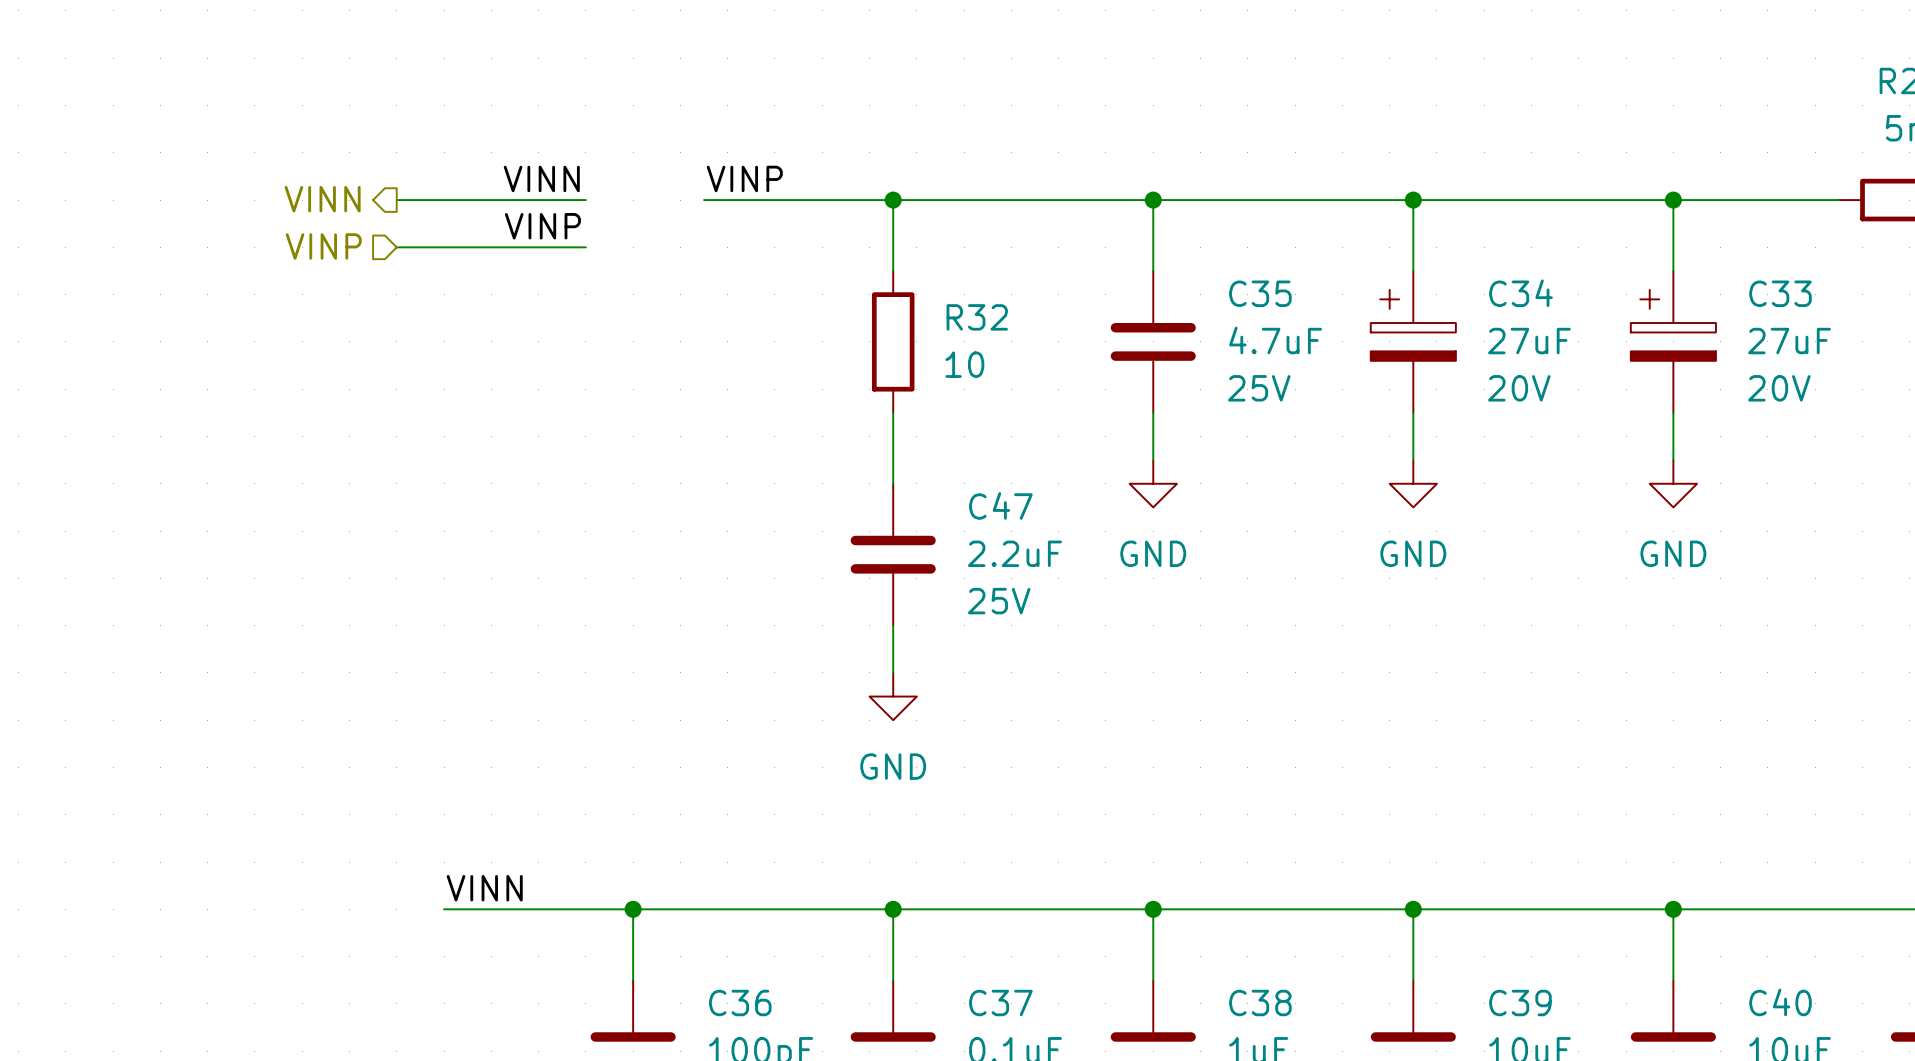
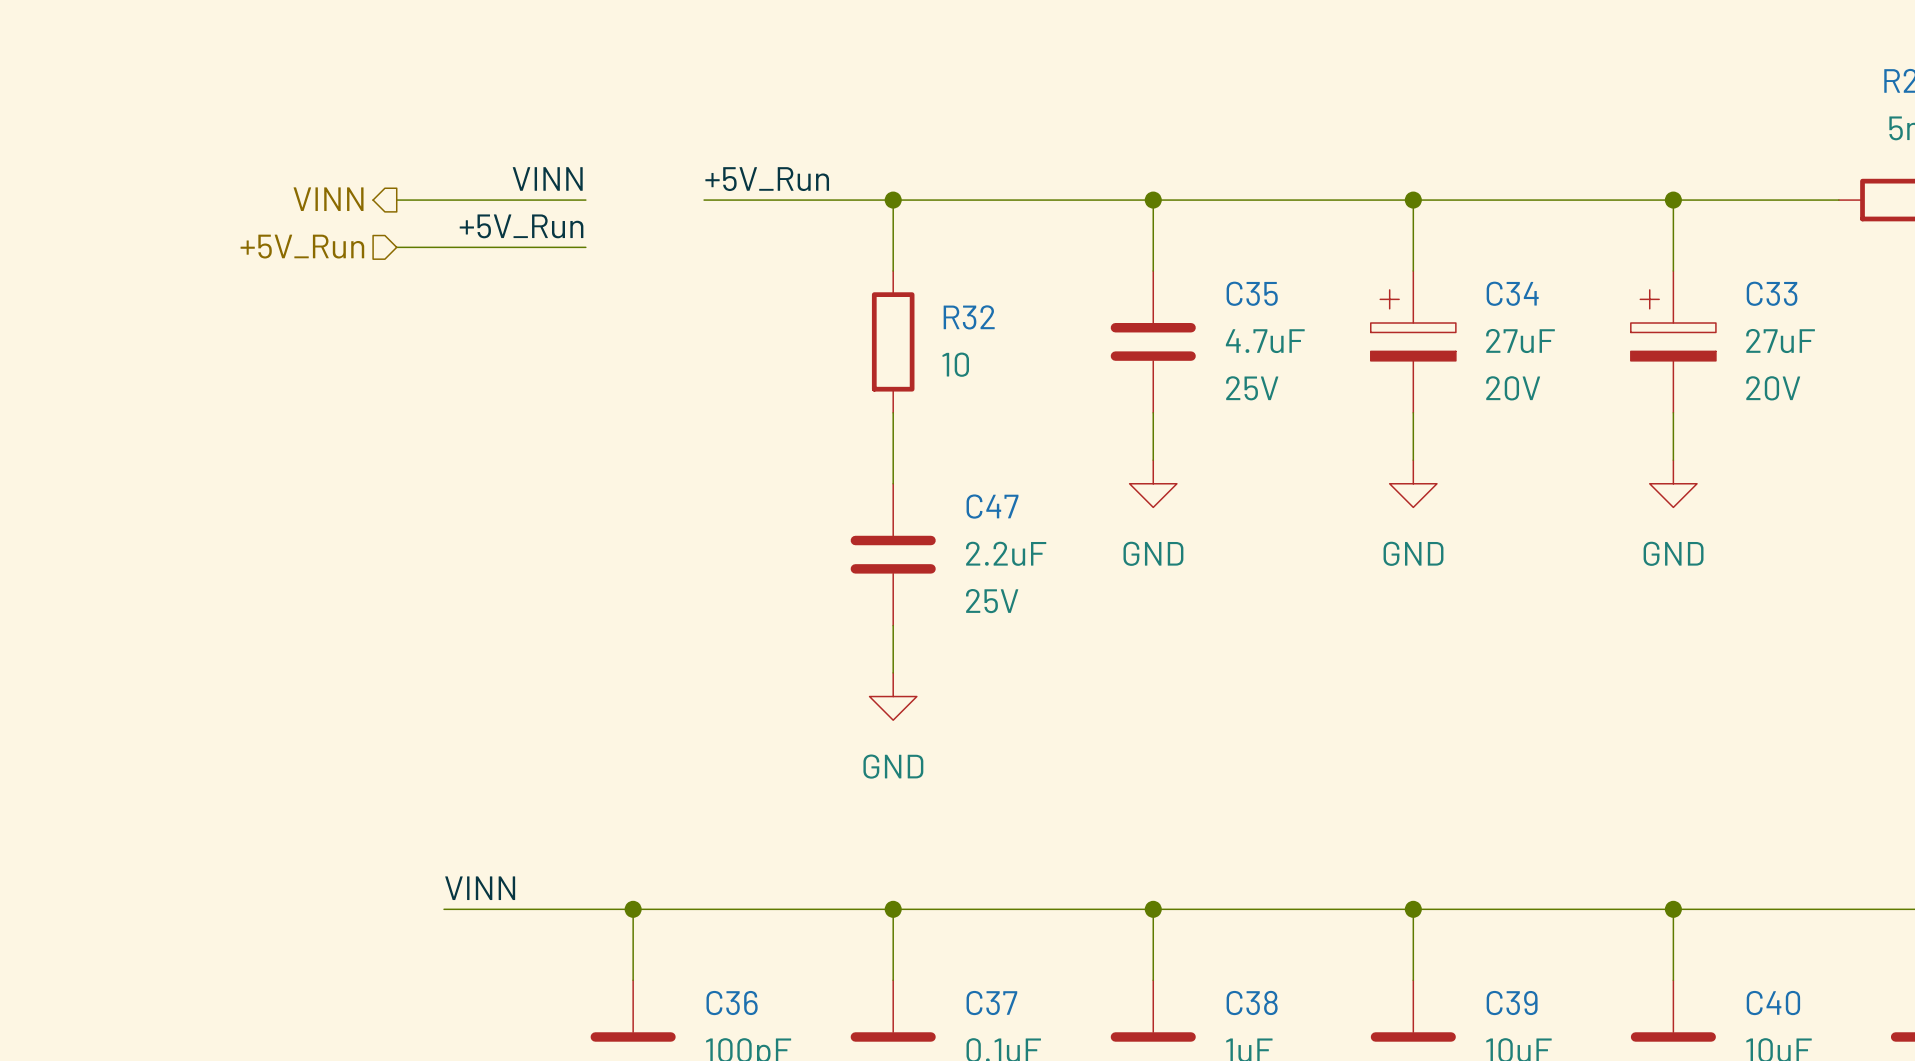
label: VINP (744, 178) -> +5V_Run (767, 179)
label: VINP (542, 226) -> +5V_Run (521, 226)
hierarchical label: VINP (323, 246) -> +5V_Run (302, 246)

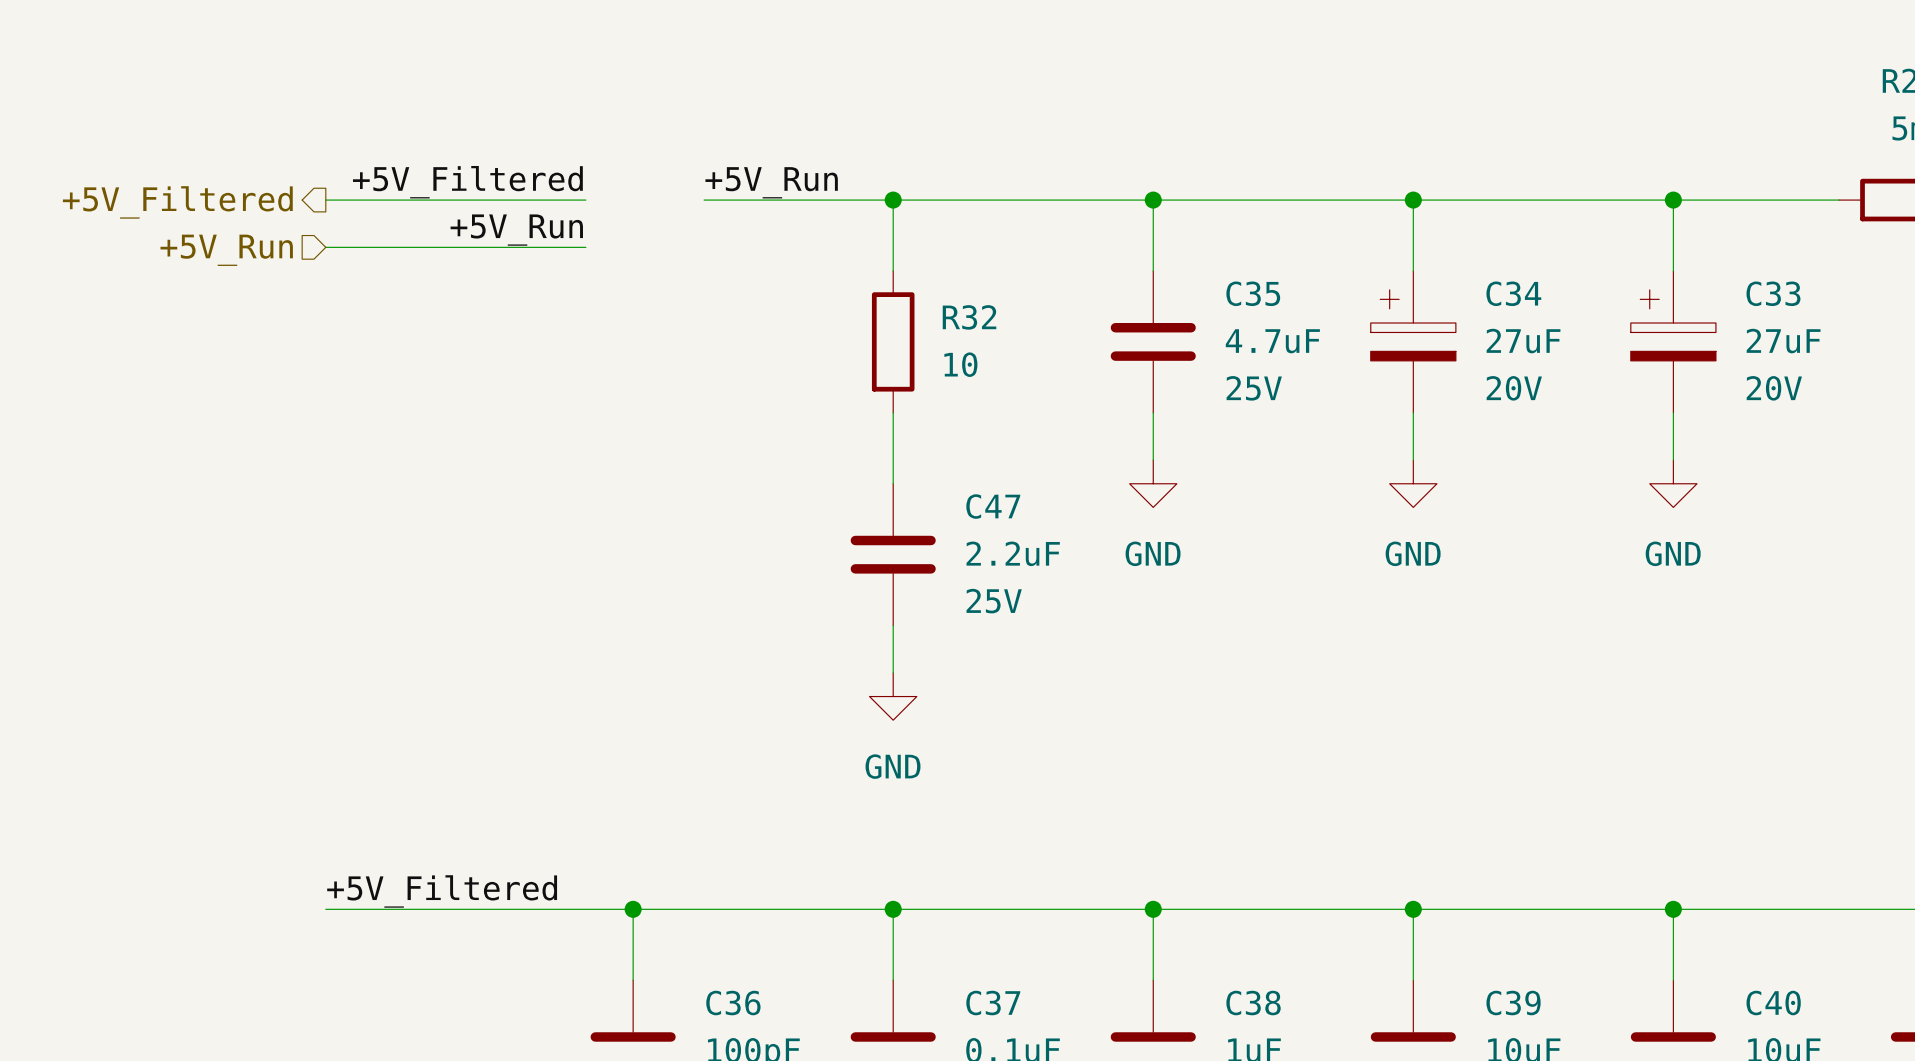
label: VINN (547, 178) -> +5V_Filtered (467, 182)
hierarchical label: none -> +5V_Filtered (177, 202)
hierarchical label: VINN (328, 199) -> none
wire: none -> (325, 200) (396, 200)
hierarchical label position: +5V_Run (302, 246) -> +5V_Run (226, 250)
wire: none -> (325, 247) (396, 247)
label: none -> +5V_Filtered (442, 891)
label: VINN (480, 888) -> none
wire: none -> (325, 909) (444, 909)

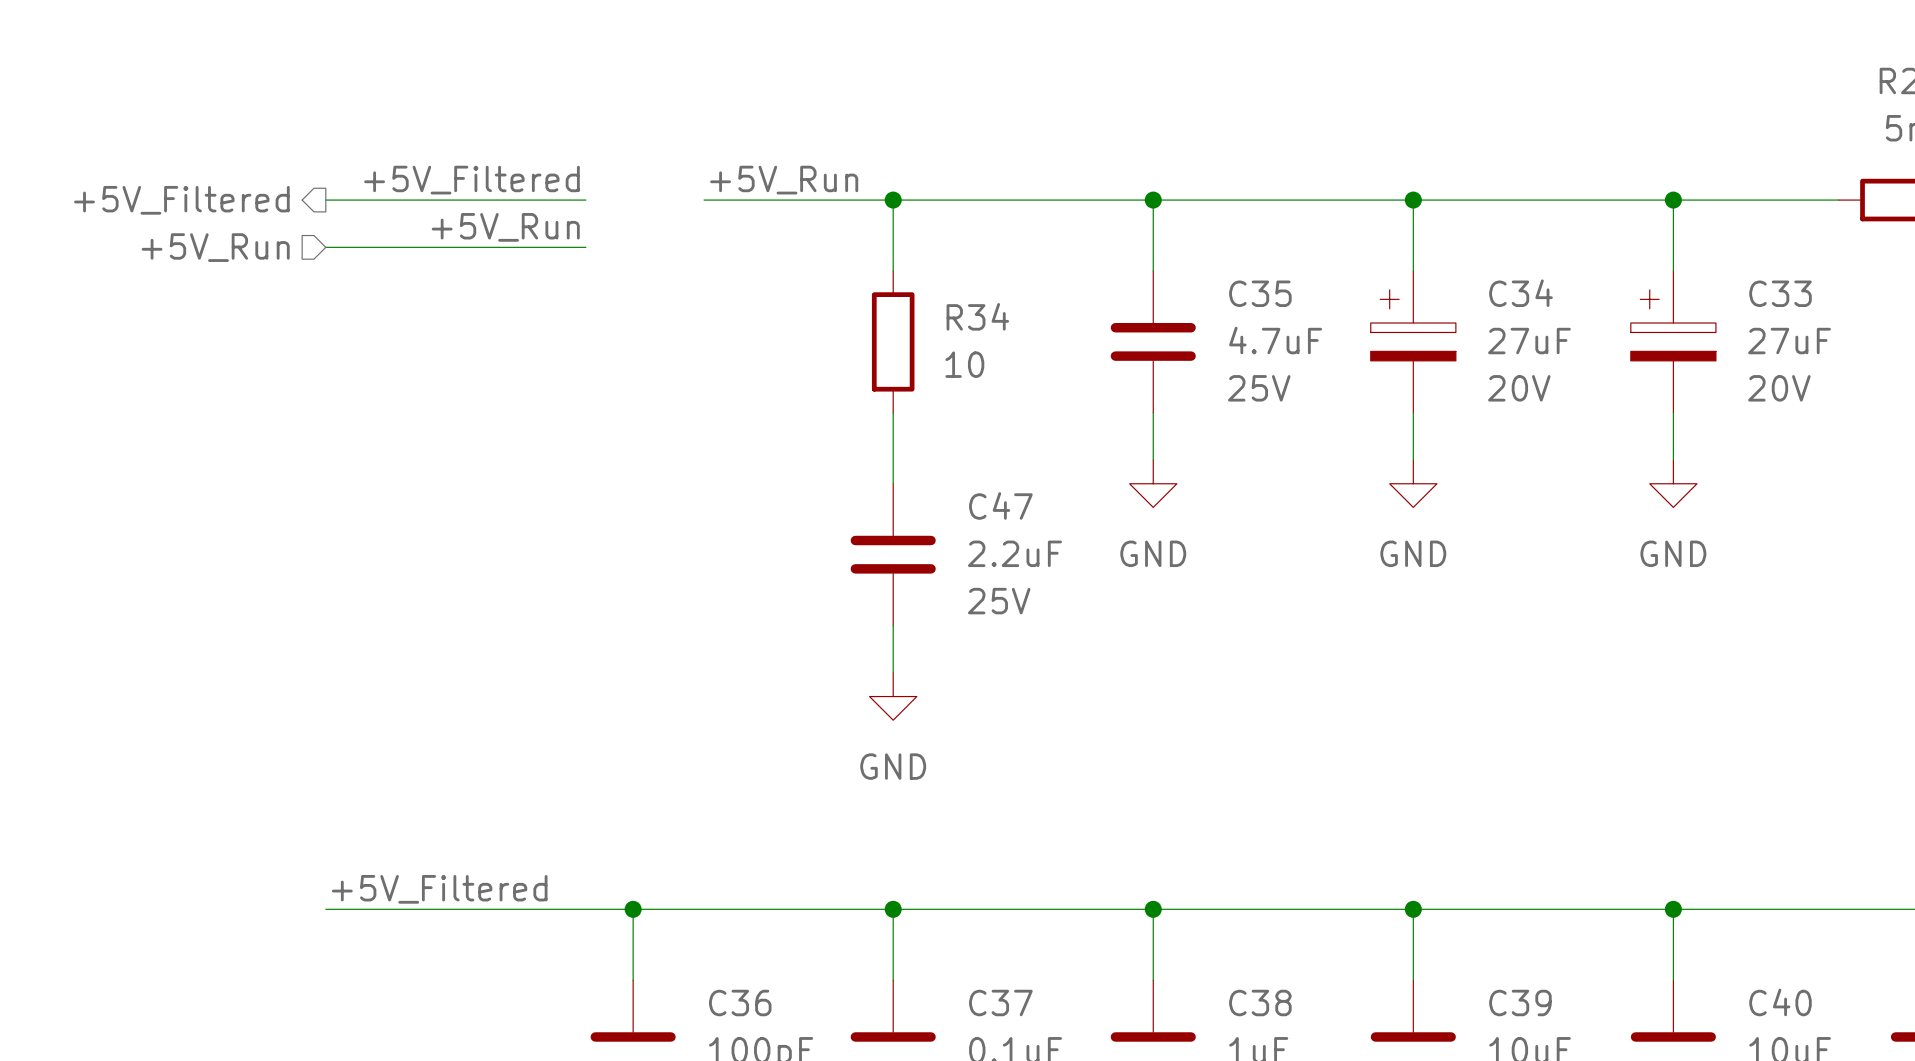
R32 name: R32 (969, 317) -> R34 (977, 316)

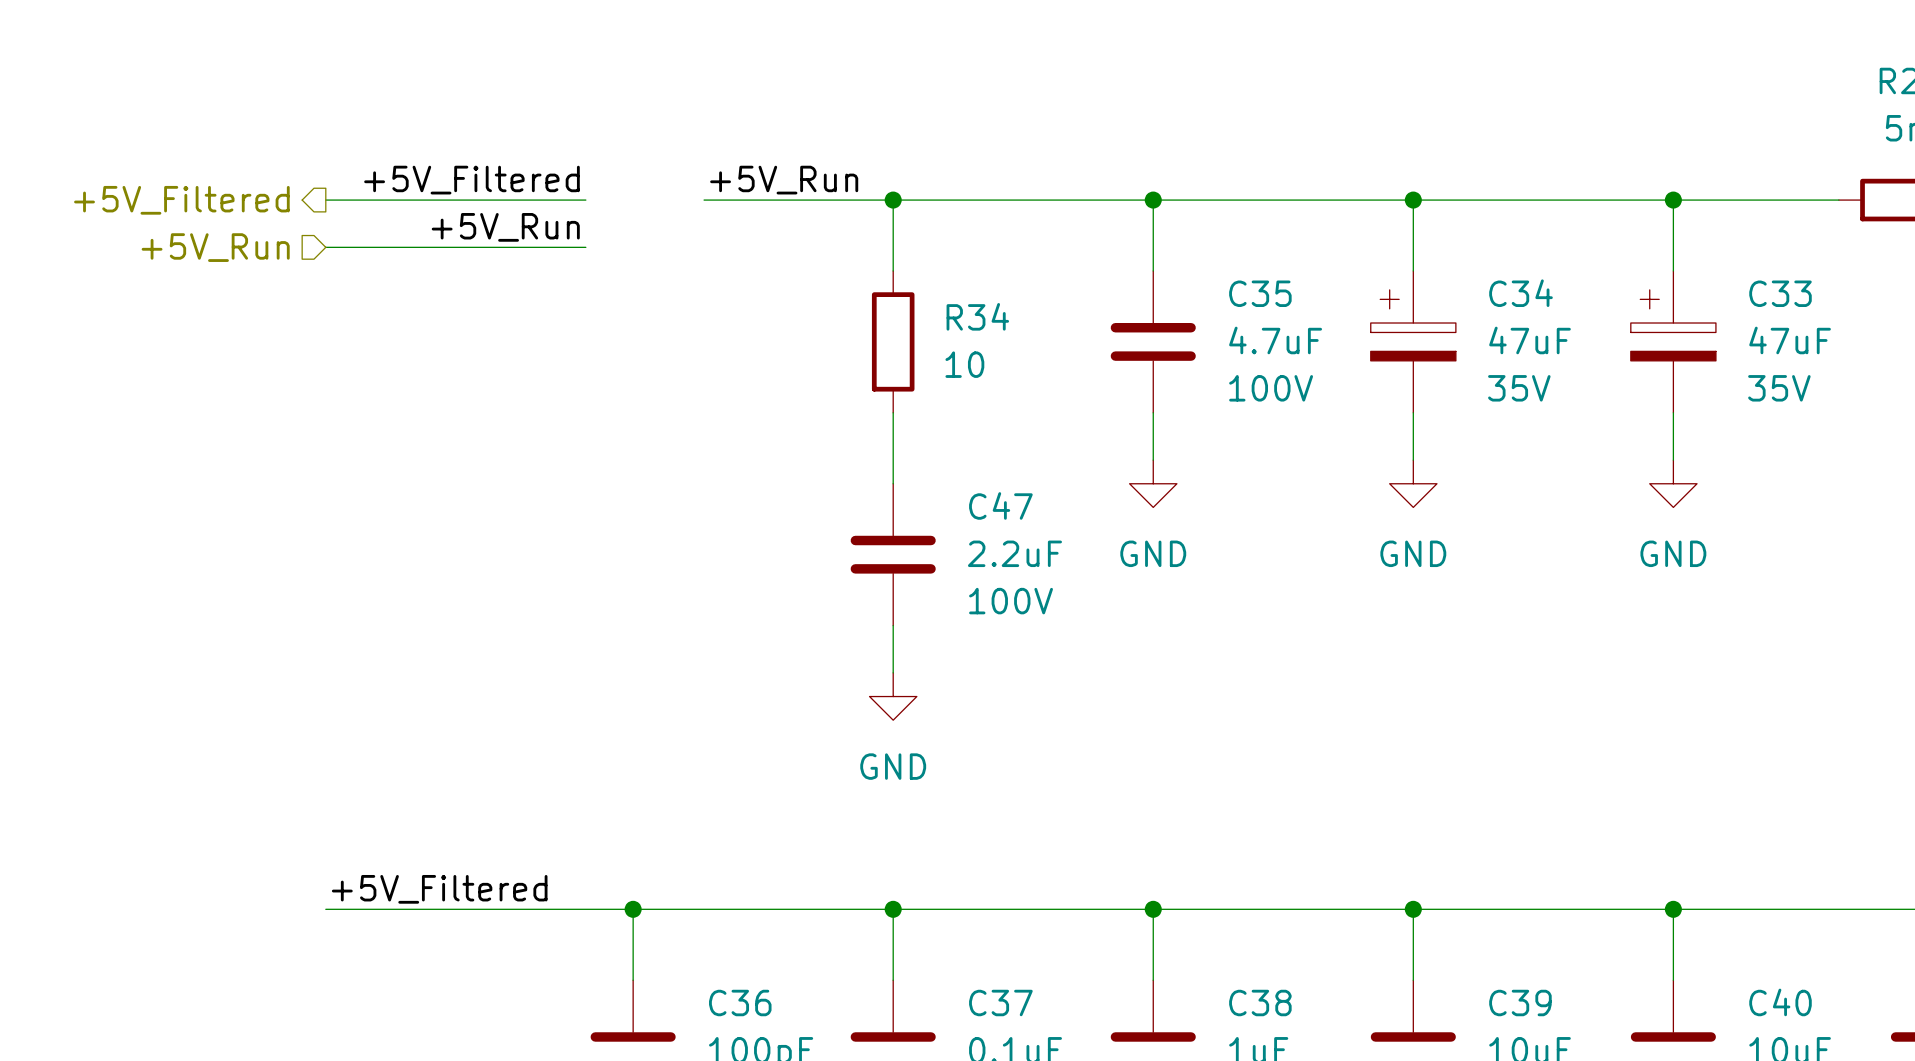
C34 value: 27uF (1529, 341) -> 47uF (1530, 340)
C33 value: 27uF (1789, 341) -> 47uF (1790, 340)
C35 text: 25V (1259, 388) -> 100V (1271, 388)
C34 text: 20V (1519, 388) -> 35V (1519, 388)
C33 text: 20V (1779, 388) -> 35V (1779, 388)
C47 text: 25V (999, 601) -> 100V (1011, 601)

